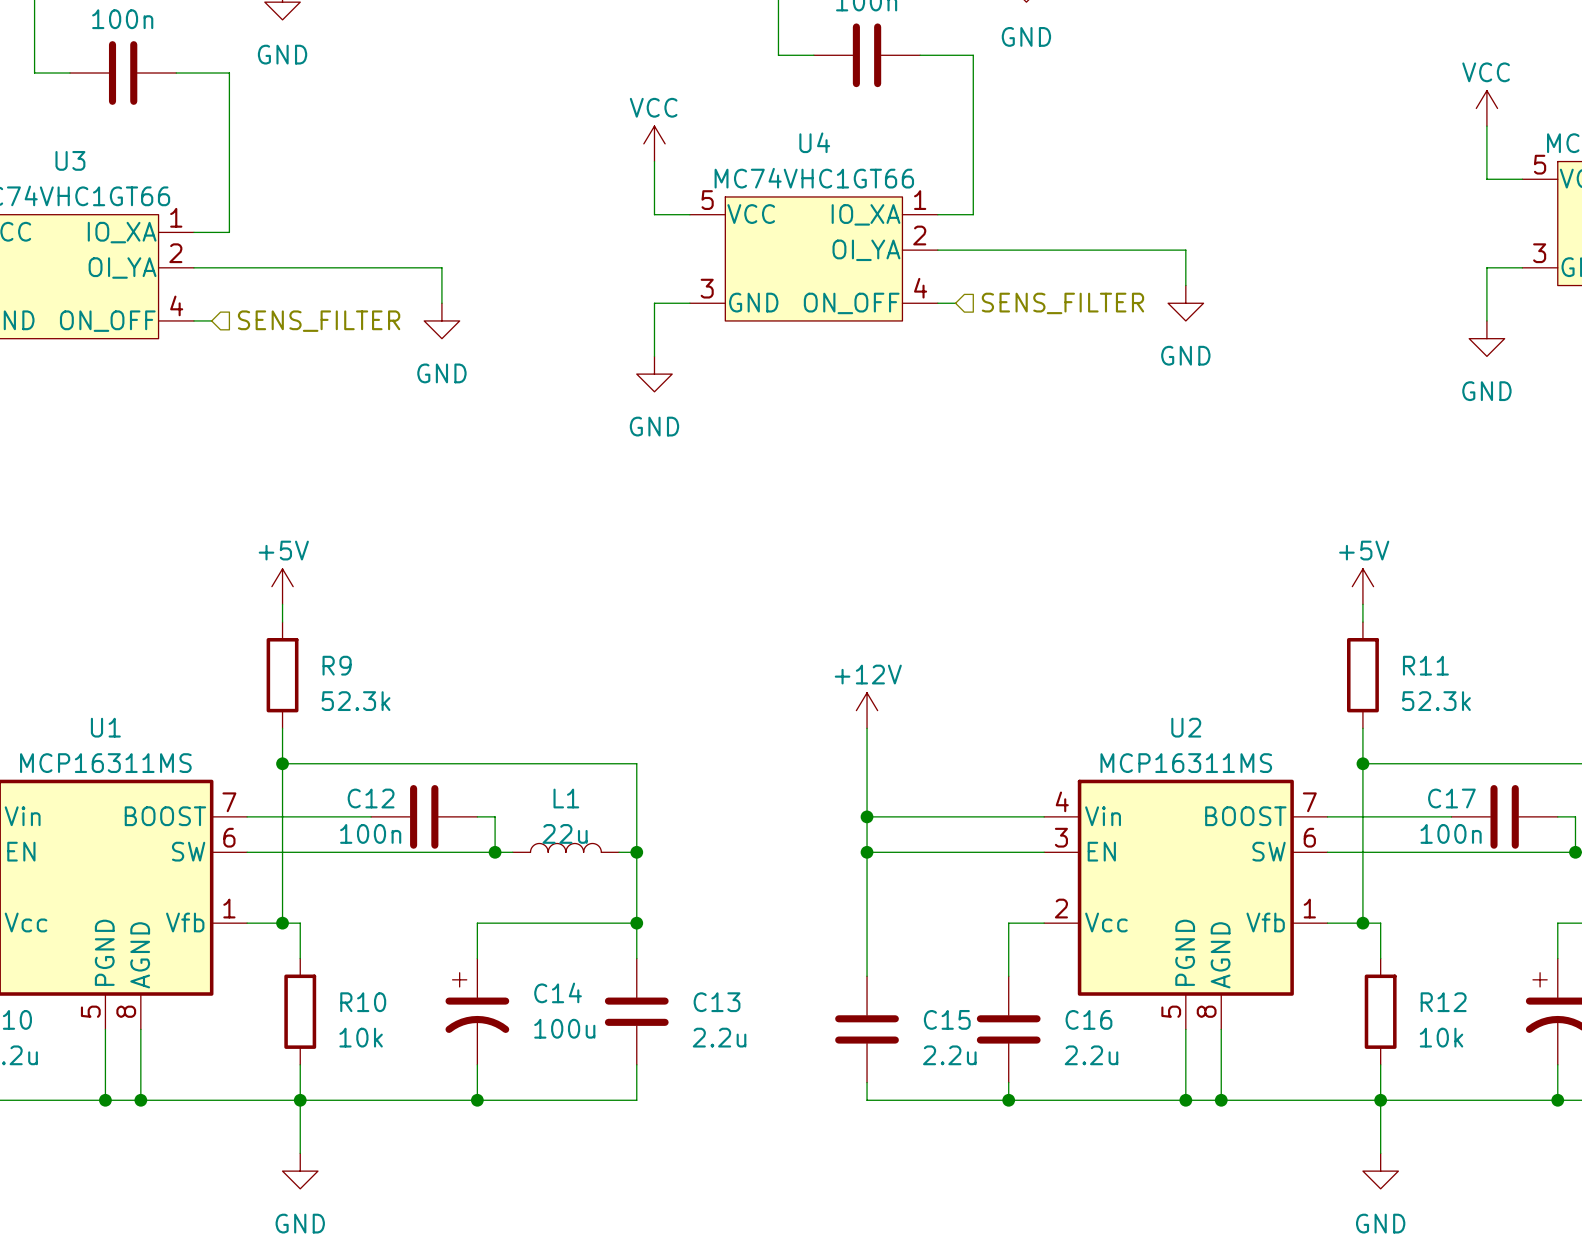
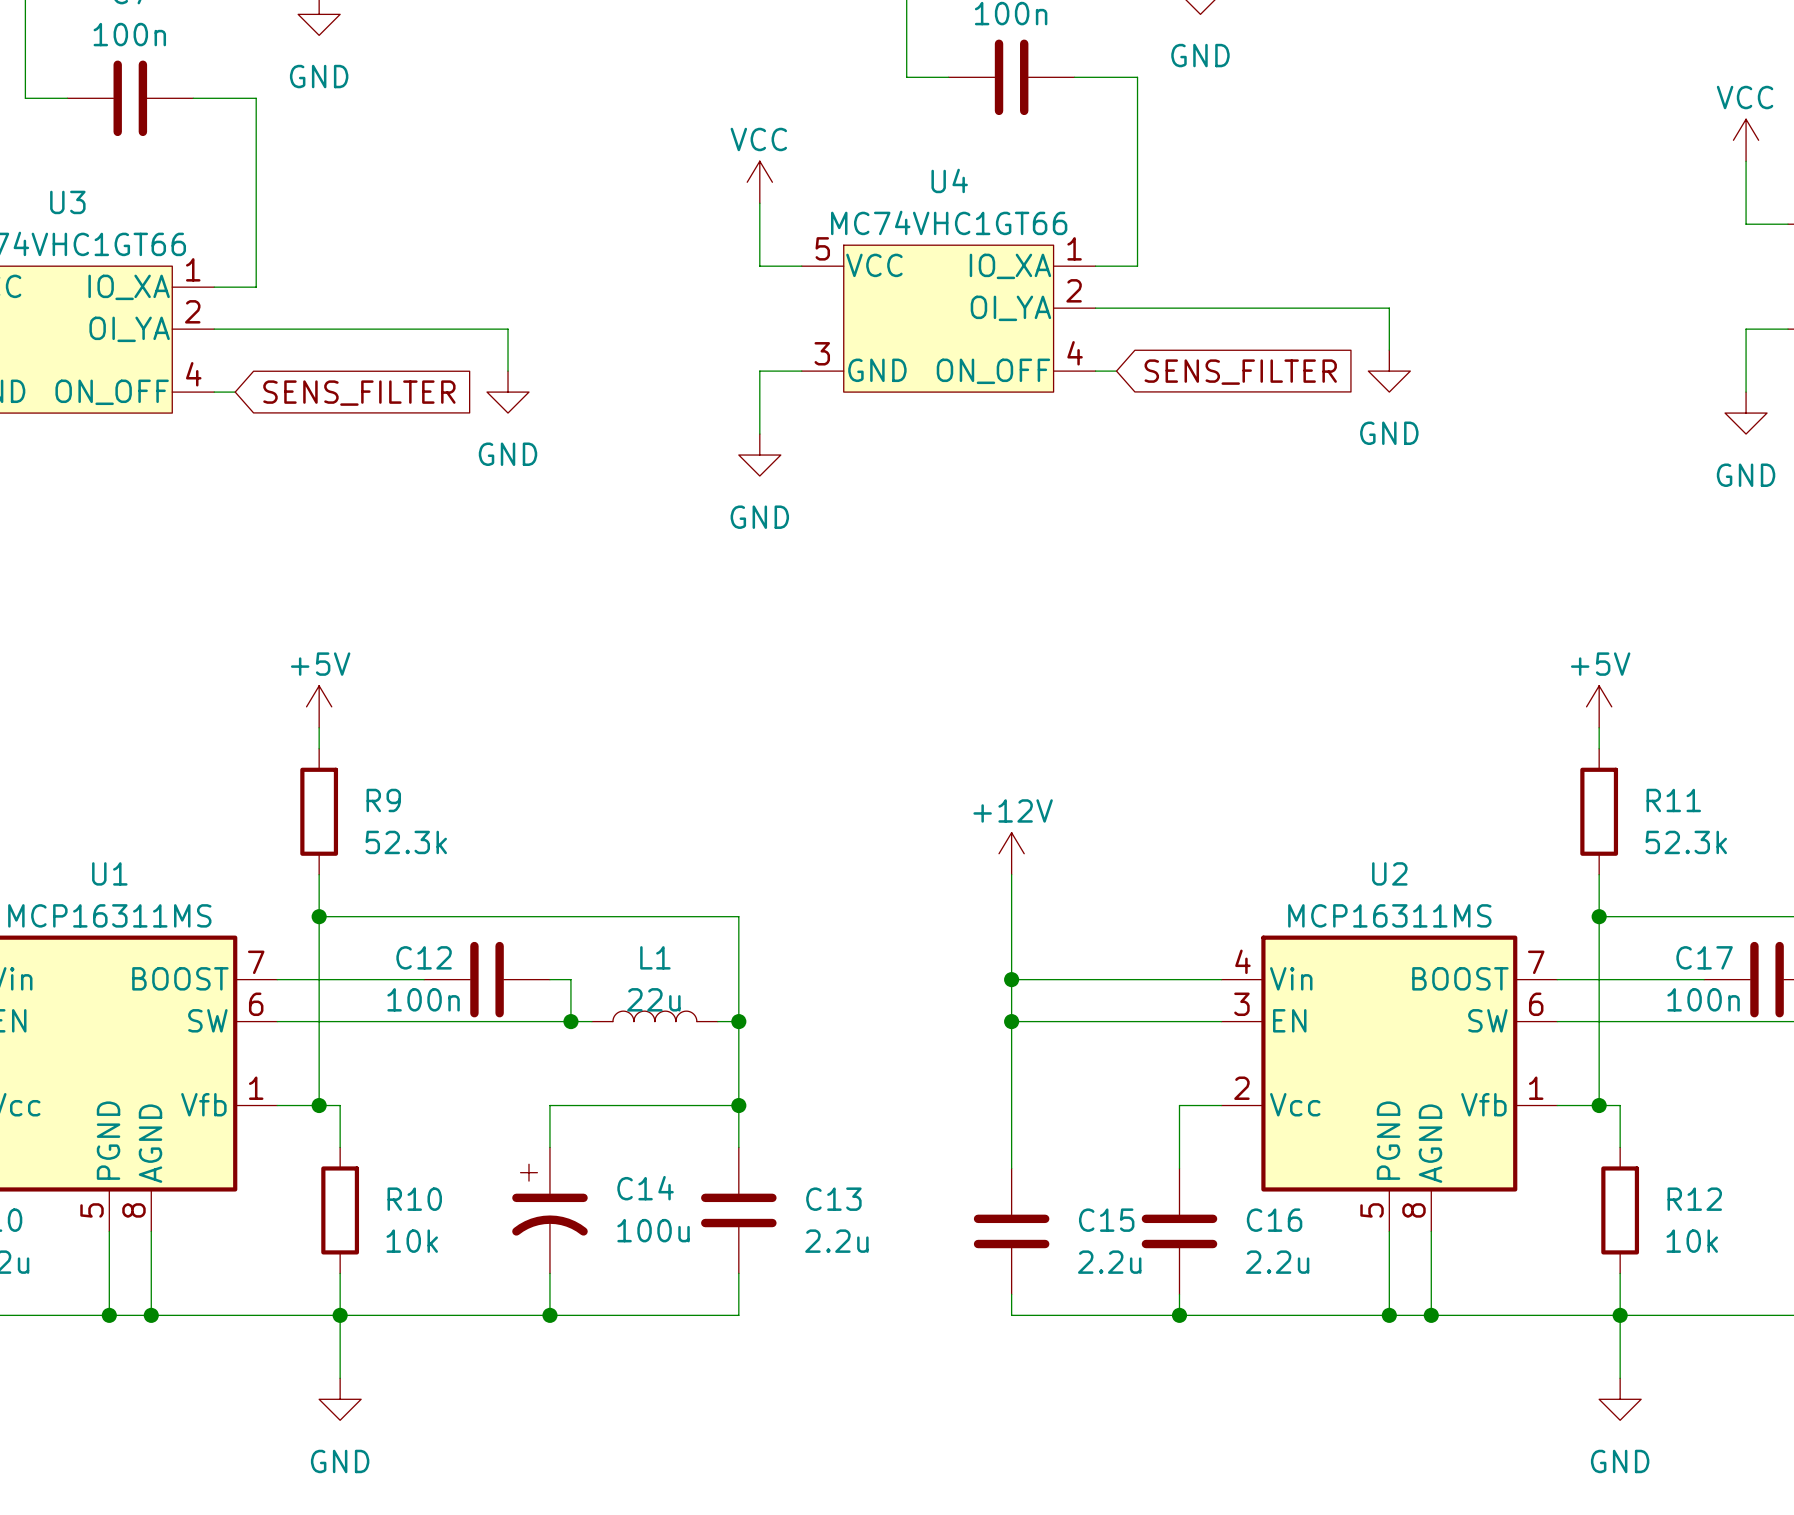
hierarchical label: SENS_FILTER (1062, 303) -> none
global label: none -> SENS_FILTER (1240, 372)
global label: none -> SENS_FILTER (359, 393)
hierarchical label: SENS_FILTER (319, 321) -> none

